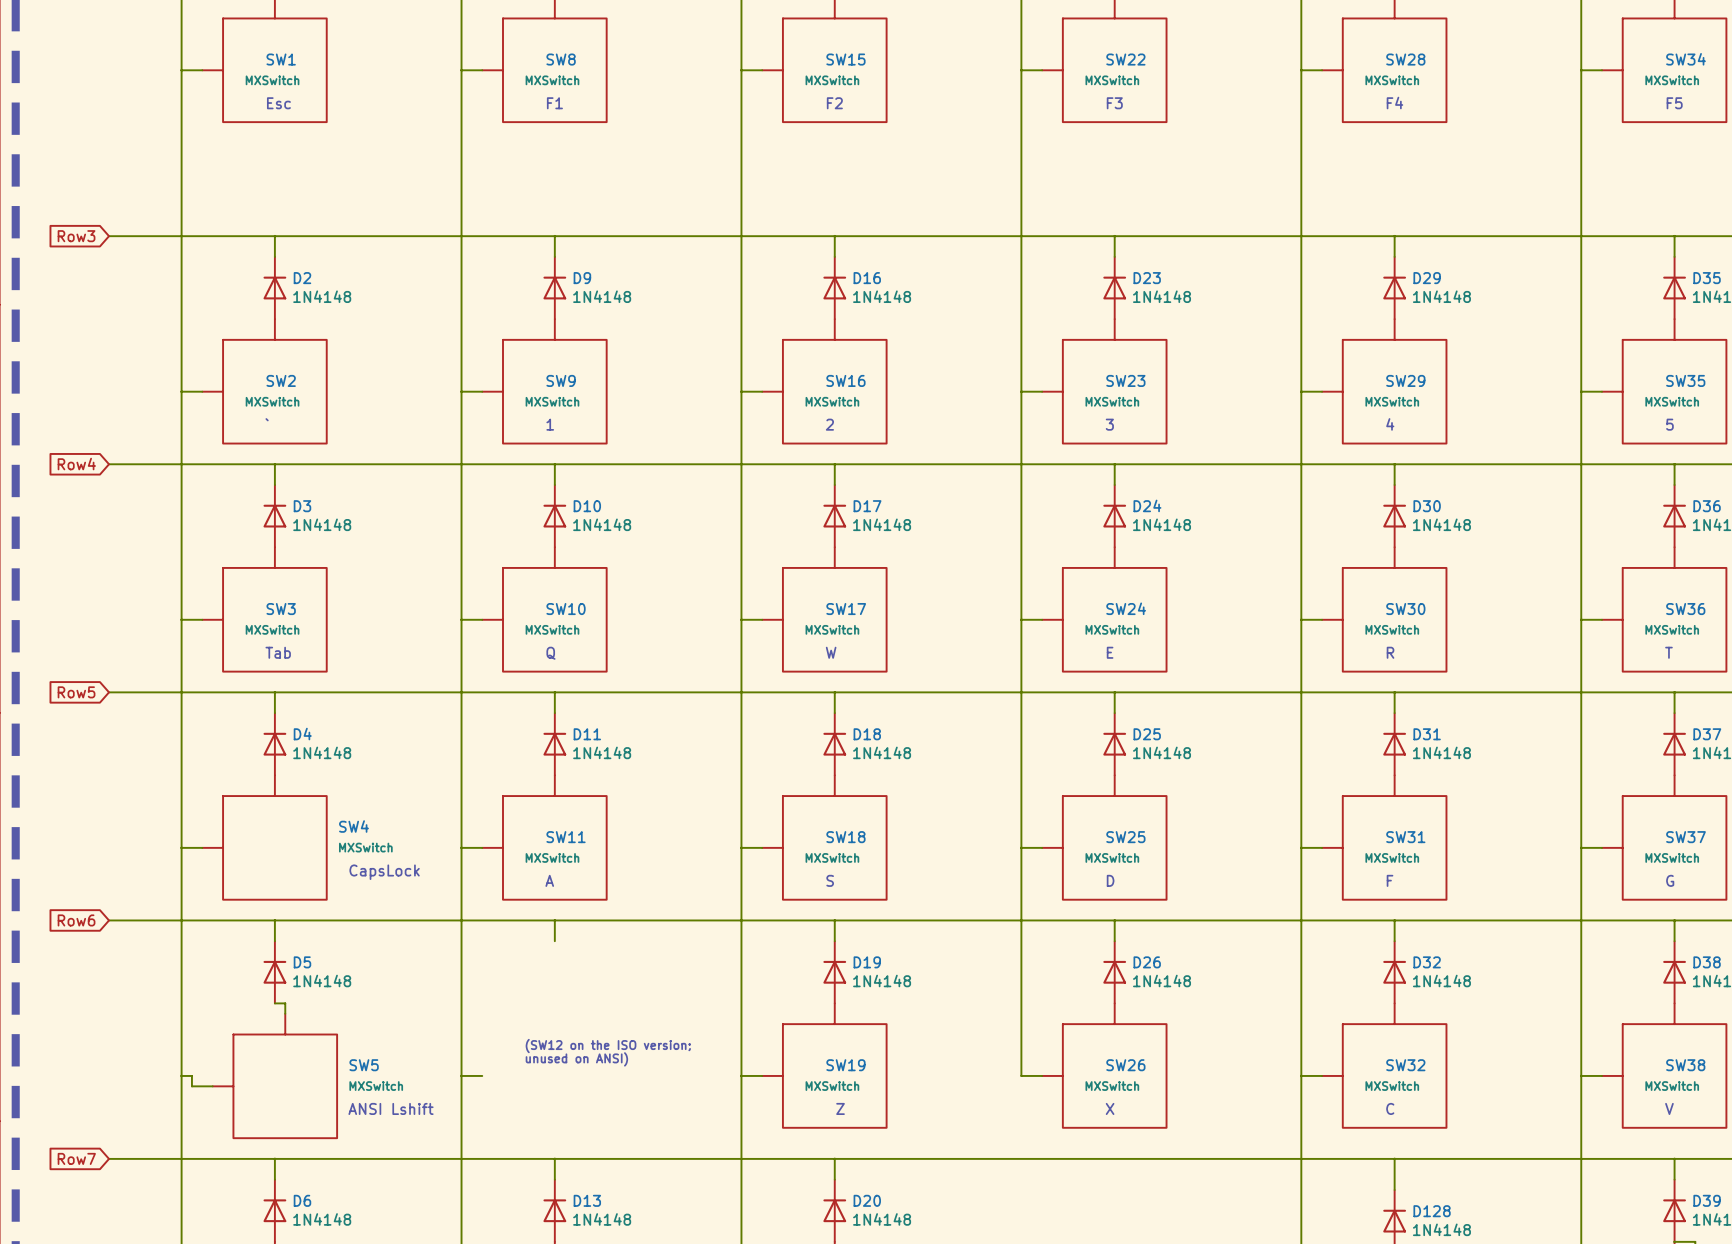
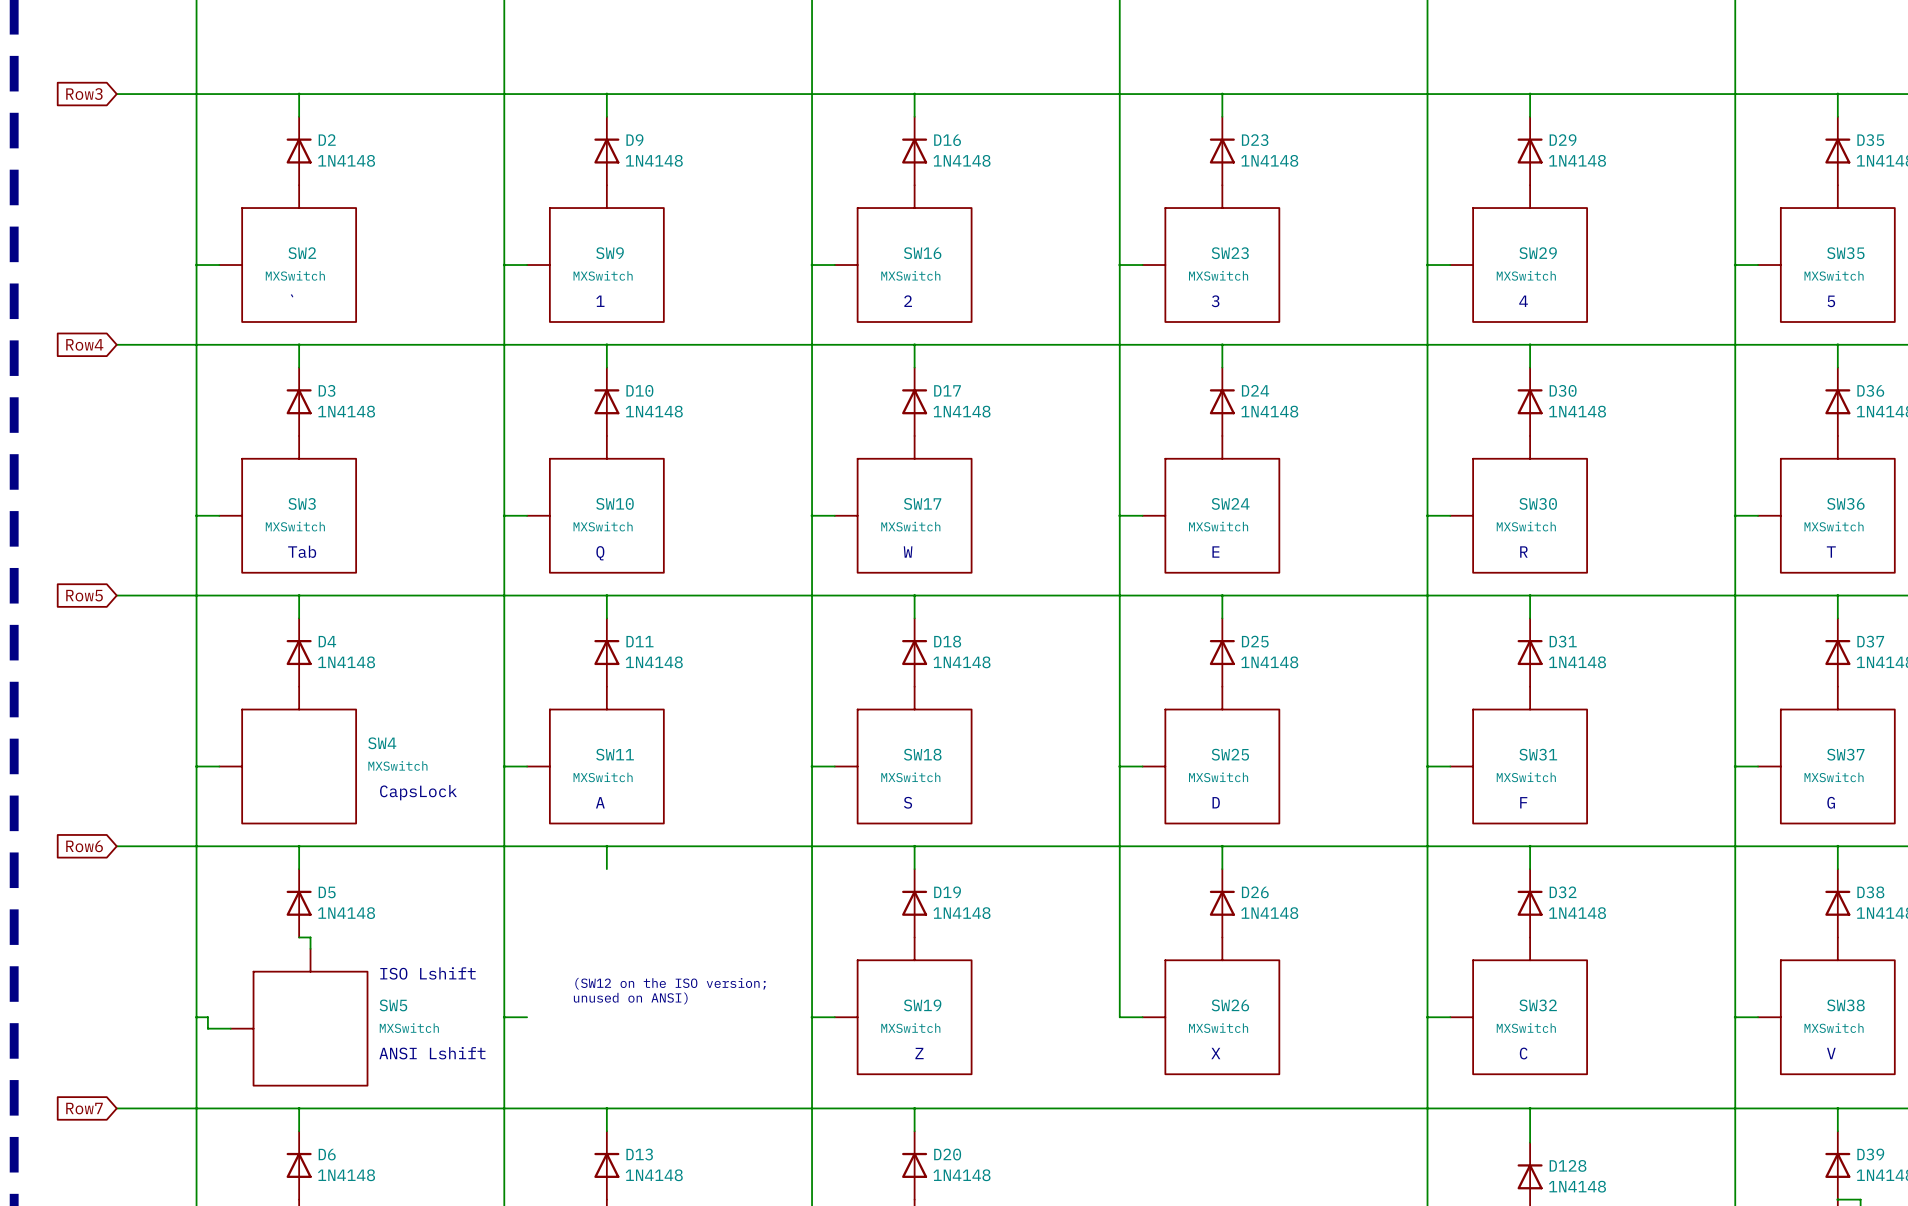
text: none -> ISO Lshift (427, 973)

